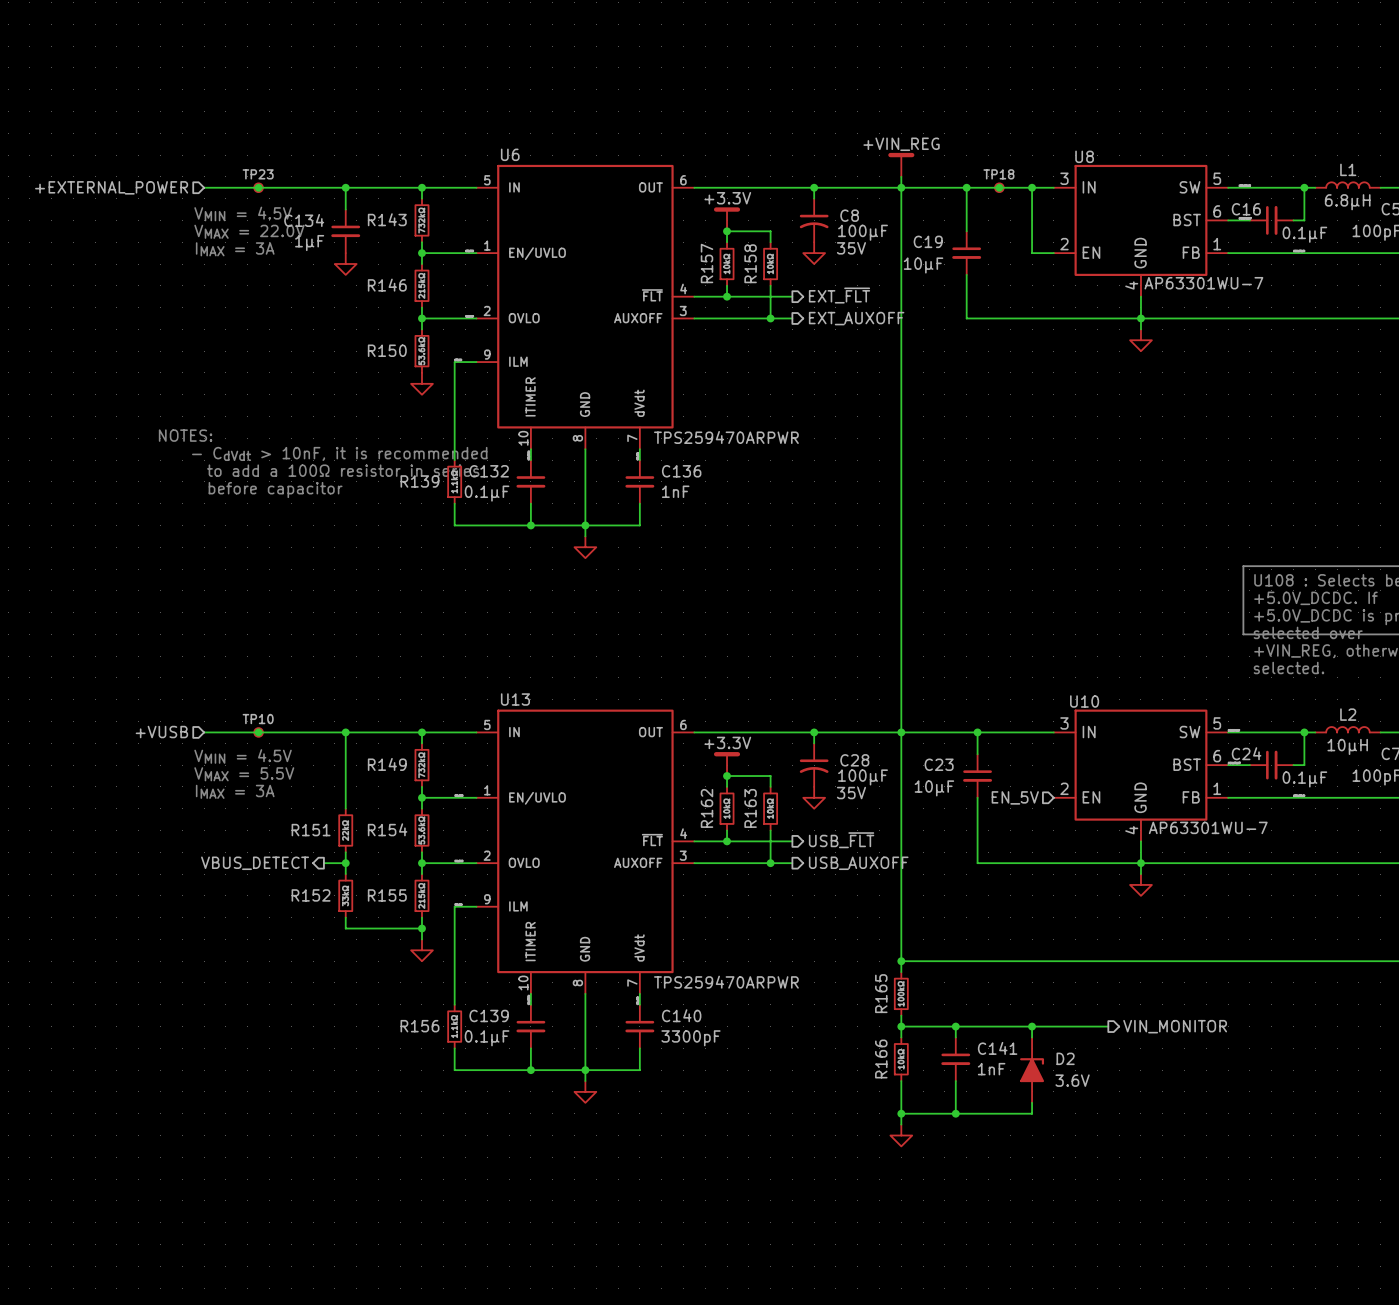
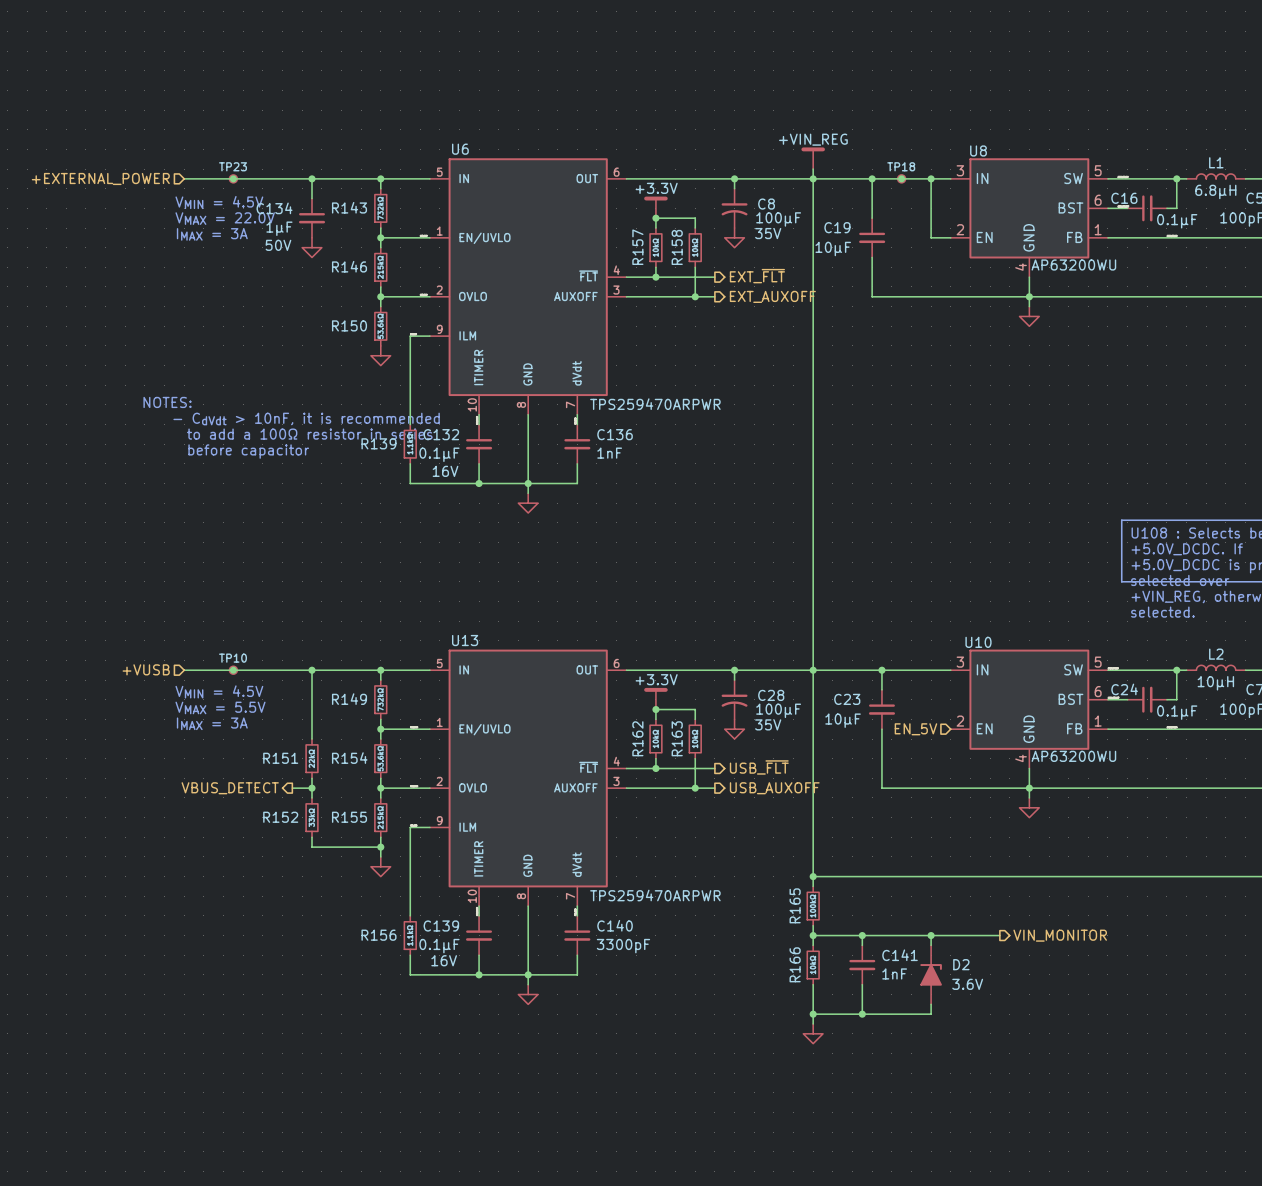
C134 text: none -> 50V (278, 245)
U8 value: AP63301WU-7 (1203, 283) -> AP63200WU (1073, 264)
C132 text: none -> 16V (445, 471)
U10 value: AP63301WU-7 (1208, 827) -> AP63200WU (1073, 756)
C139 text: none -> 16V (444, 960)

